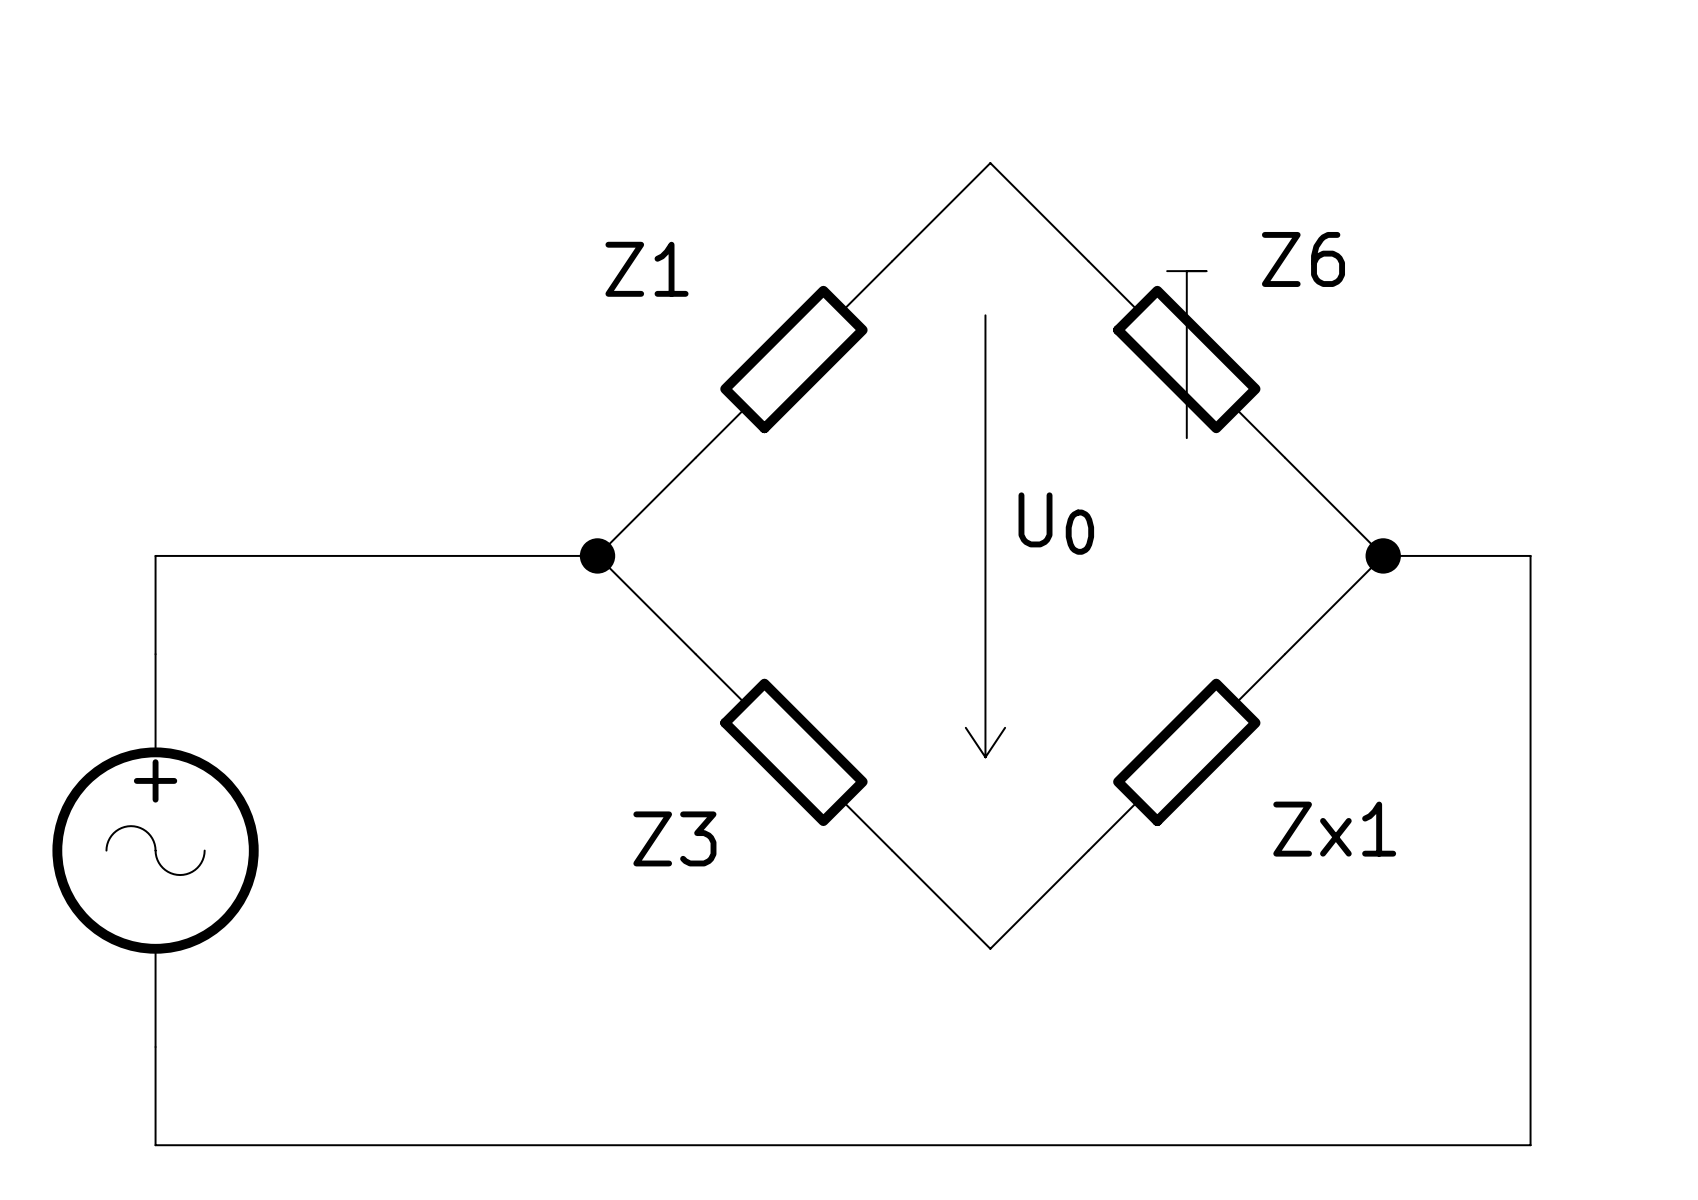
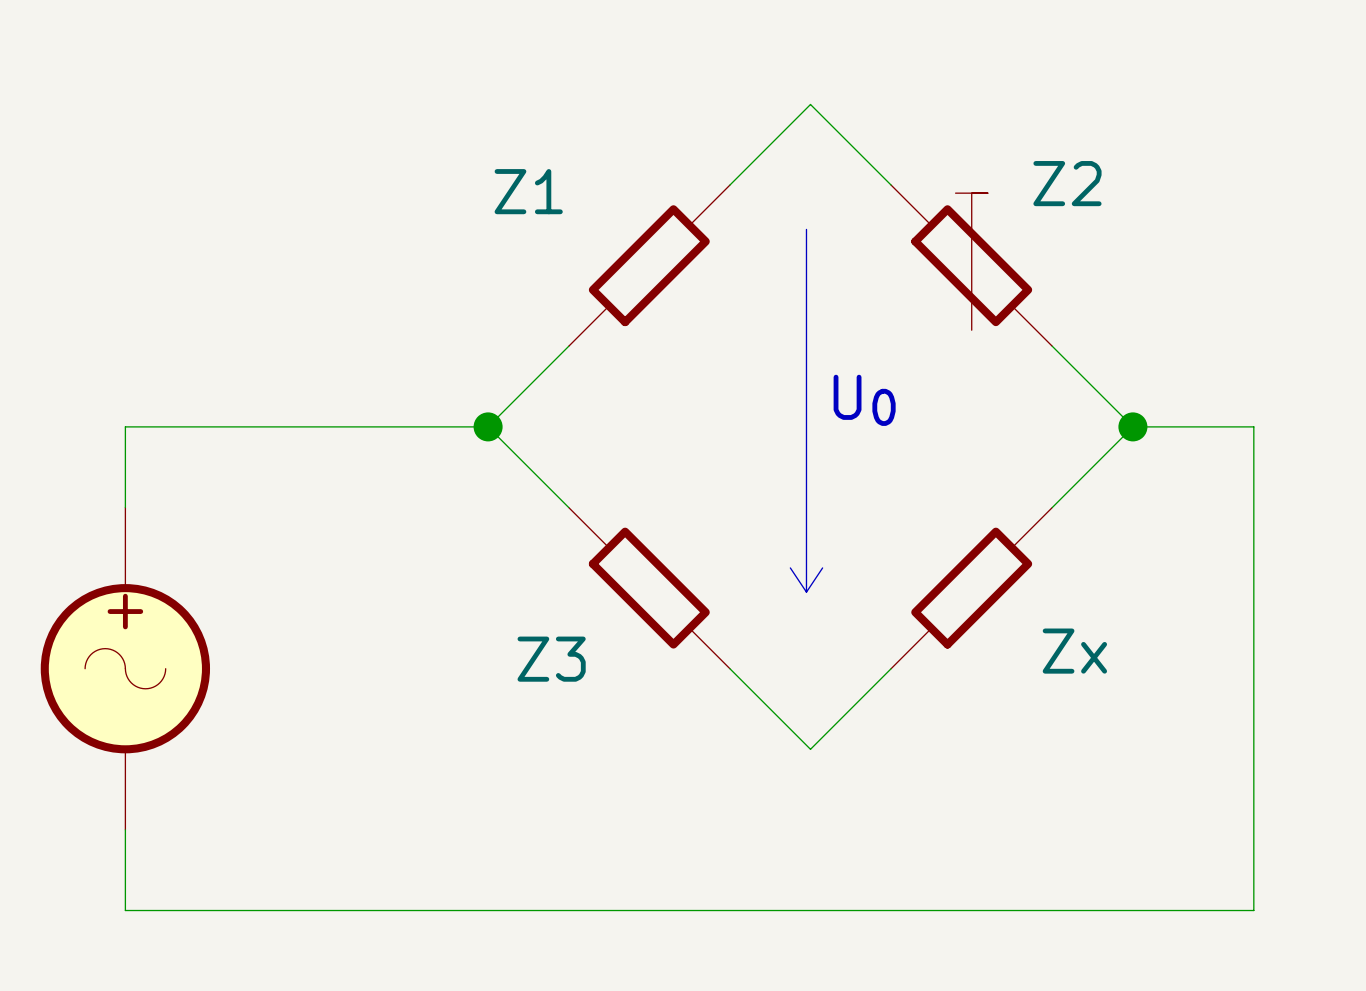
Z6 name: Z6 (1303, 259) -> Z2 (1067, 183)
Zx1 name: Zx1 (1334, 829) -> Zx (1074, 651)

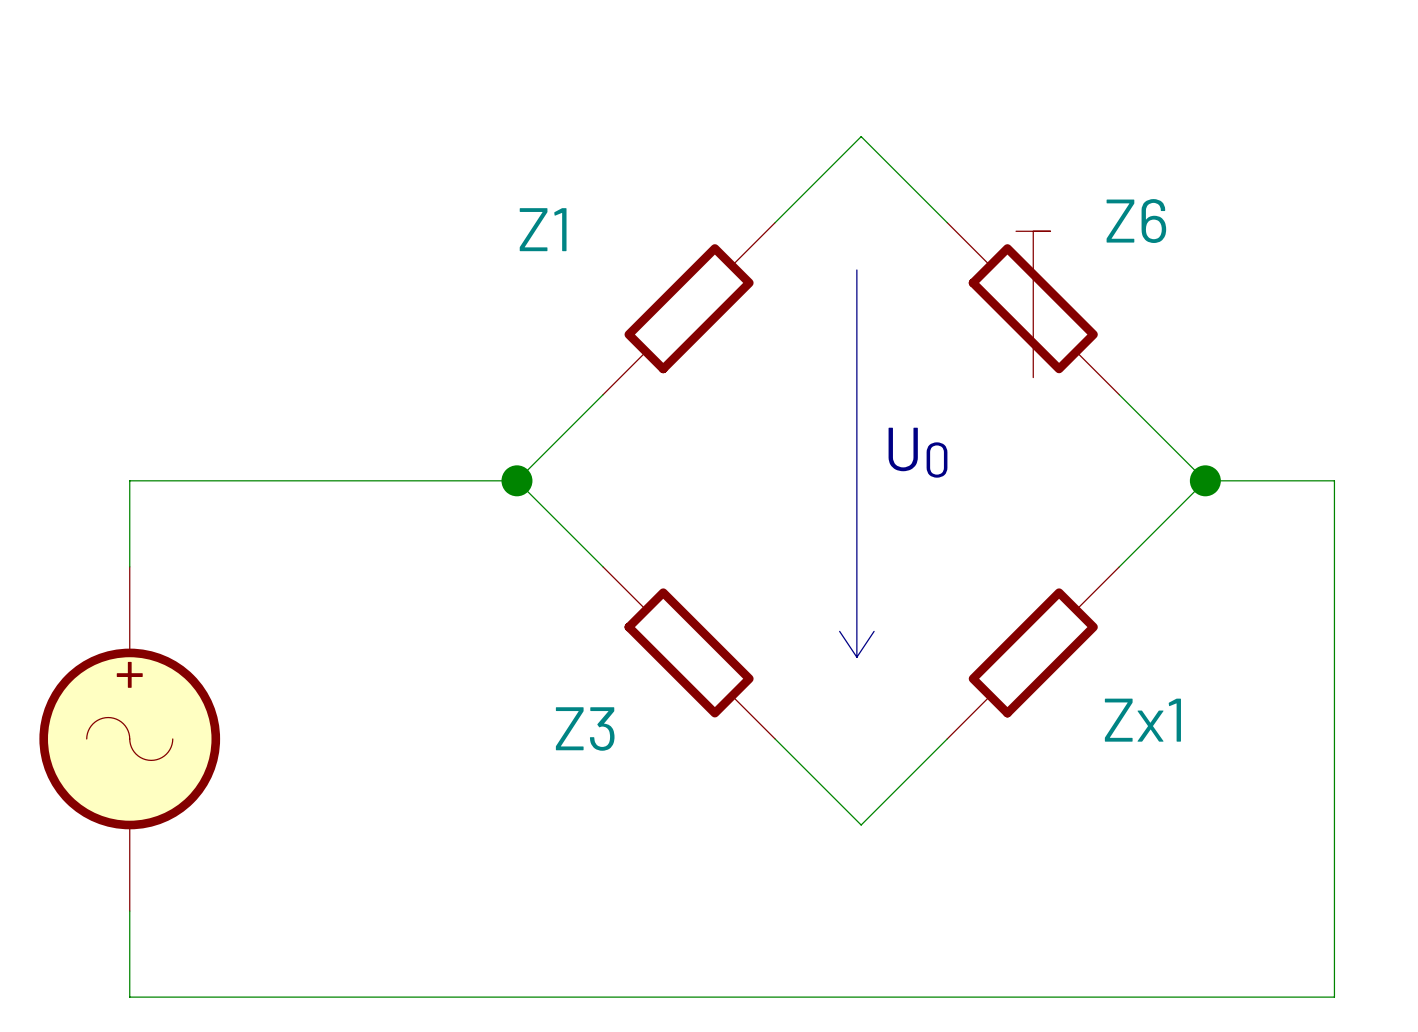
Z2 name: Z2 (1067, 183) -> Z6 (1136, 221)
Zx name: Zx (1074, 651) -> Zx1 (1142, 720)

